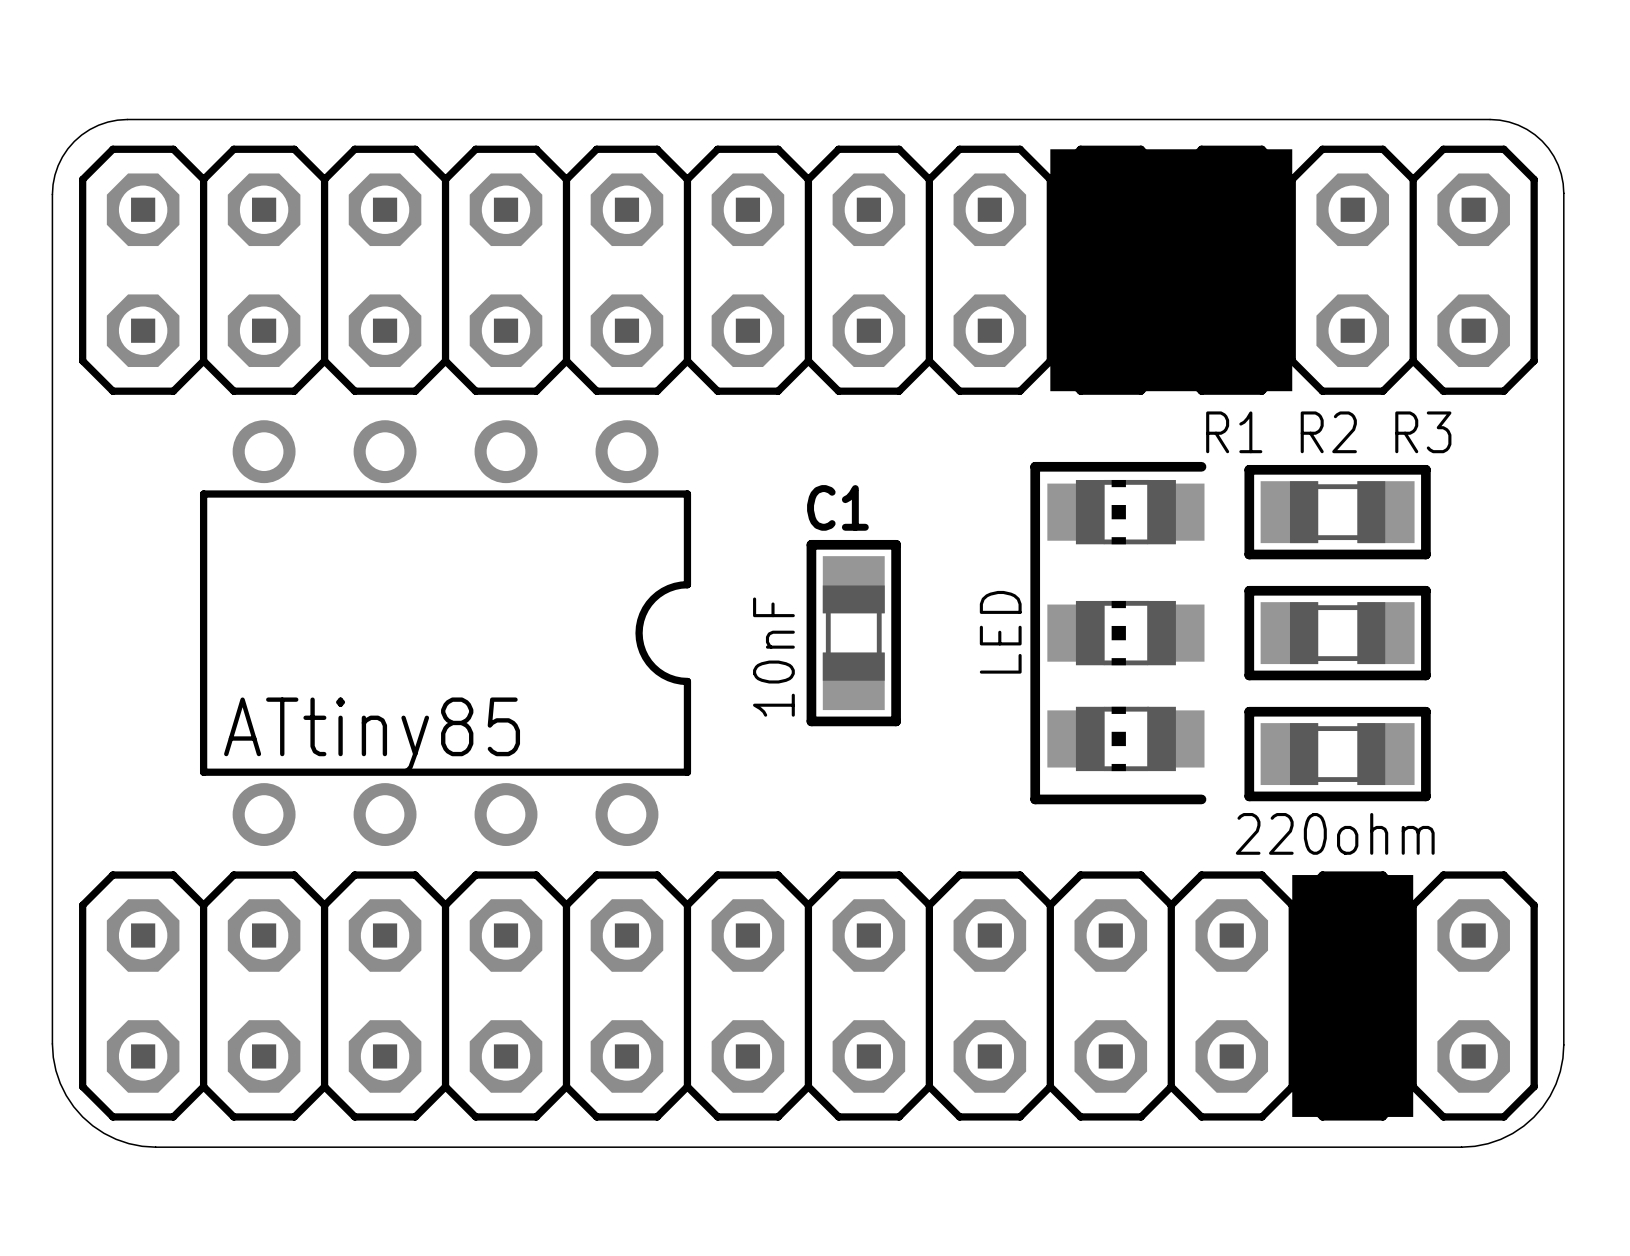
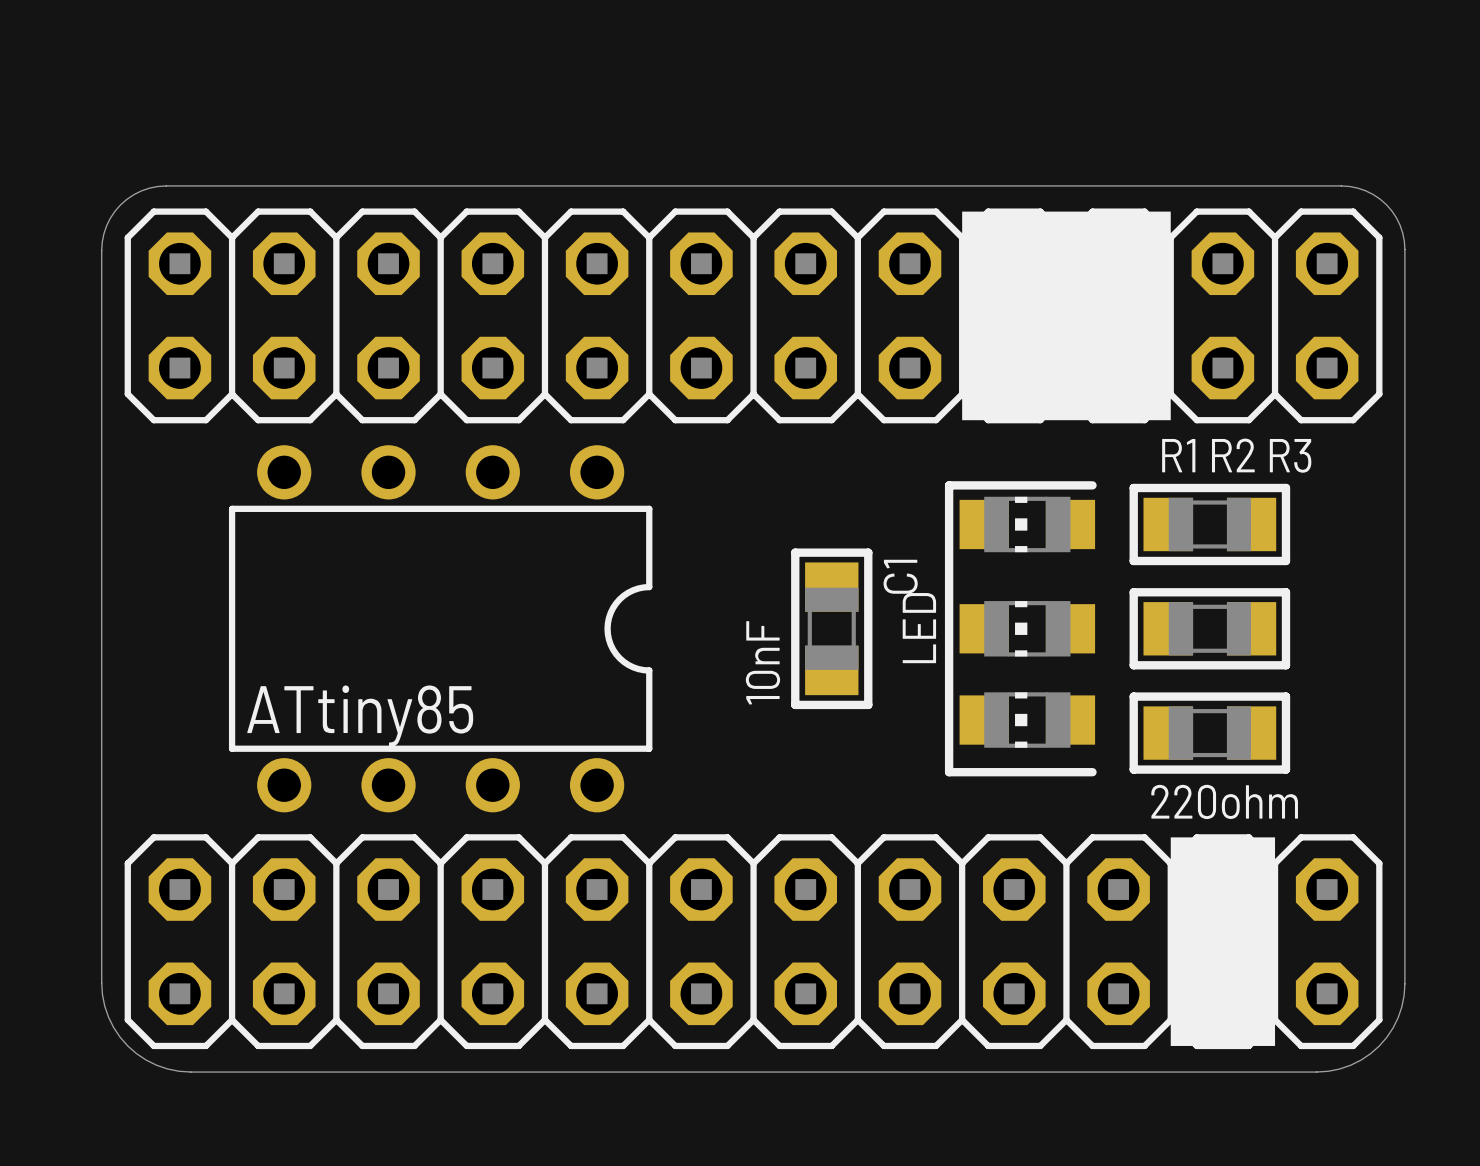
C1 name rotation: 0° (837, 507) -> 90° counterclockwise (900, 576)
C1 name position: C1 (837, 507) -> C1 (900, 576)
C1 position: (853, 633) -> (831, 628)
text position: 10nF (773, 657) -> 10nF (762, 662)

